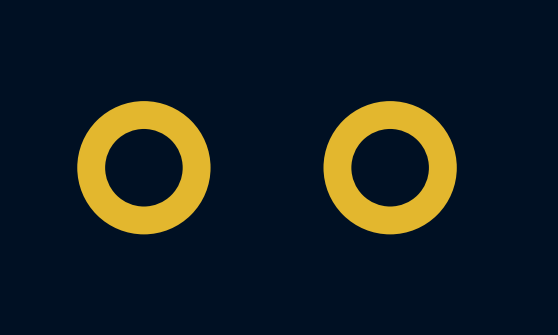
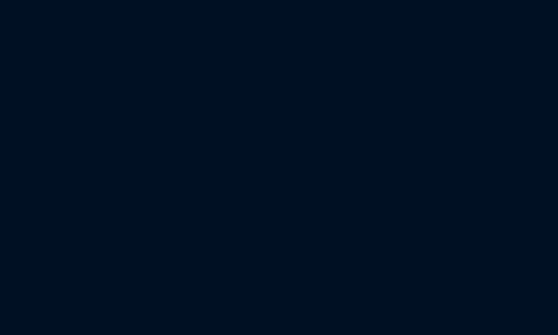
part: (143, 167) -> none
part: (390, 167) -> none

